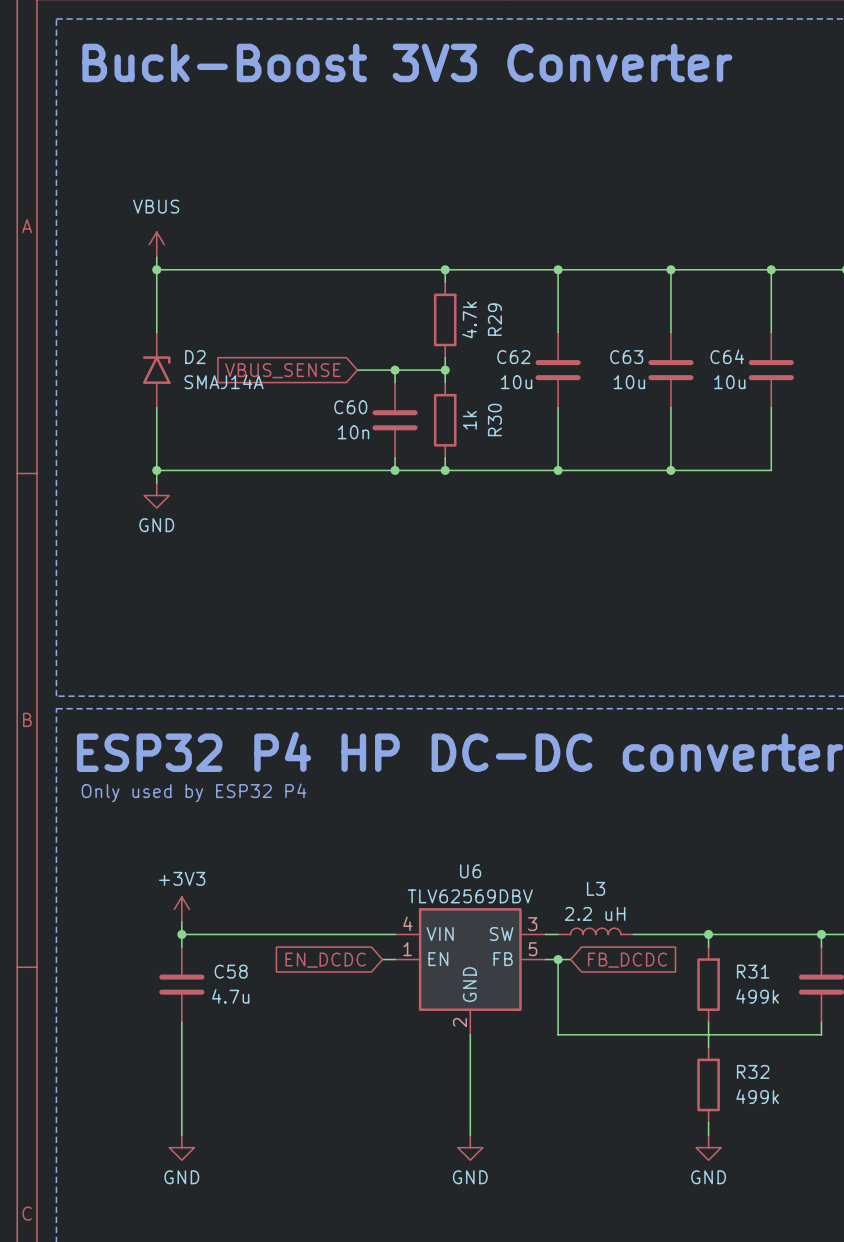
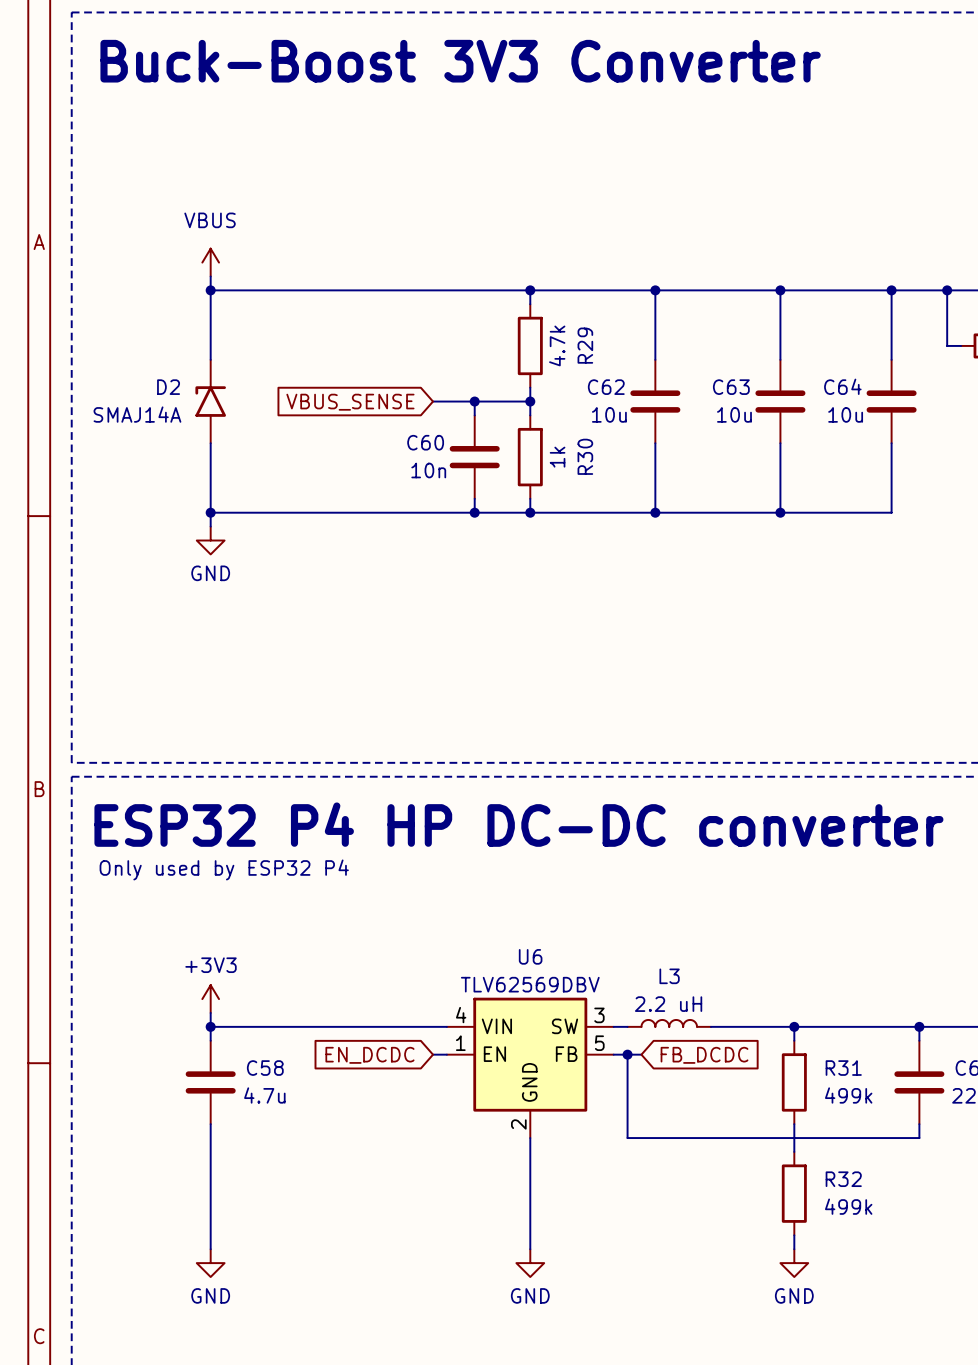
power symbol position: VBUS (156, 244) -> VBUS (210, 262)
wire: (156, 257) (156, 332) -> (210, 276) (210, 359)
wire: (156, 269) (181, 269) -> none
junction position: (156, 269) -> (210, 290)
wire: (445, 269) (445, 282) -> (530, 290) (530, 304)
junction position: (445, 269) -> (530, 290)
wire: (558, 269) (558, 332) -> (655, 290) (655, 359)
junction position: (558, 269) -> (655, 290)
wire: (670, 269) (670, 332) -> (780, 290) (780, 359)
junction position: (670, 269) -> (780, 290)
wire: (771, 269) (771, 332) -> (891, 290) (891, 359)
junction position: (771, 269) -> (891, 290)
R29 position: (445, 319) -> (530, 345)
wire: (445, 357) (445, 382) -> (530, 387) (530, 415)
D2 flip: as is (156, 370) -> left-right (210, 401)
global label position: VBUS_SENSE (282, 370) -> VBUS_SENSE (350, 402)
wire: (357, 370) (382, 370) -> (502, 401) (530, 401)
wire: (395, 370) (395, 382) -> (474, 401) (474, 415)
junction: (395, 370) -> none
junction: none -> (474, 401)
junction: (445, 370) -> none
junction: none -> (530, 401)
C62 position: (558, 370) -> (655, 401)
C63 position: (670, 370) -> (780, 401)
C64 position: (771, 370) -> (891, 401)
wire: (156, 407) (156, 482) -> (210, 443) (210, 526)
wire: (558, 407) (558, 470) -> (655, 443) (655, 512)
wire: (670, 407) (670, 470) -> (780, 443) (780, 512)
wire: (771, 407) (771, 470) -> (891, 443) (891, 512) (863, 512)
C60 position: (395, 420) -> (474, 457)
R30 position: (445, 420) -> (530, 457)
wire: (395, 457) (395, 470) -> (474, 498) (474, 512)
wire: (445, 457) (445, 470) -> (530, 498) (530, 512)
wire: (156, 470) (181, 470) -> none
junction position: (156, 470) -> (210, 512)
junction: (395, 470) -> none
junction: none -> (474, 512)
junction: (445, 470) -> none
junction: none -> (530, 512)
junction position: (558, 470) -> (655, 512)
junction position: (670, 470) -> (780, 512)
power symbol position: GND (156, 495) -> GND (210, 540)

